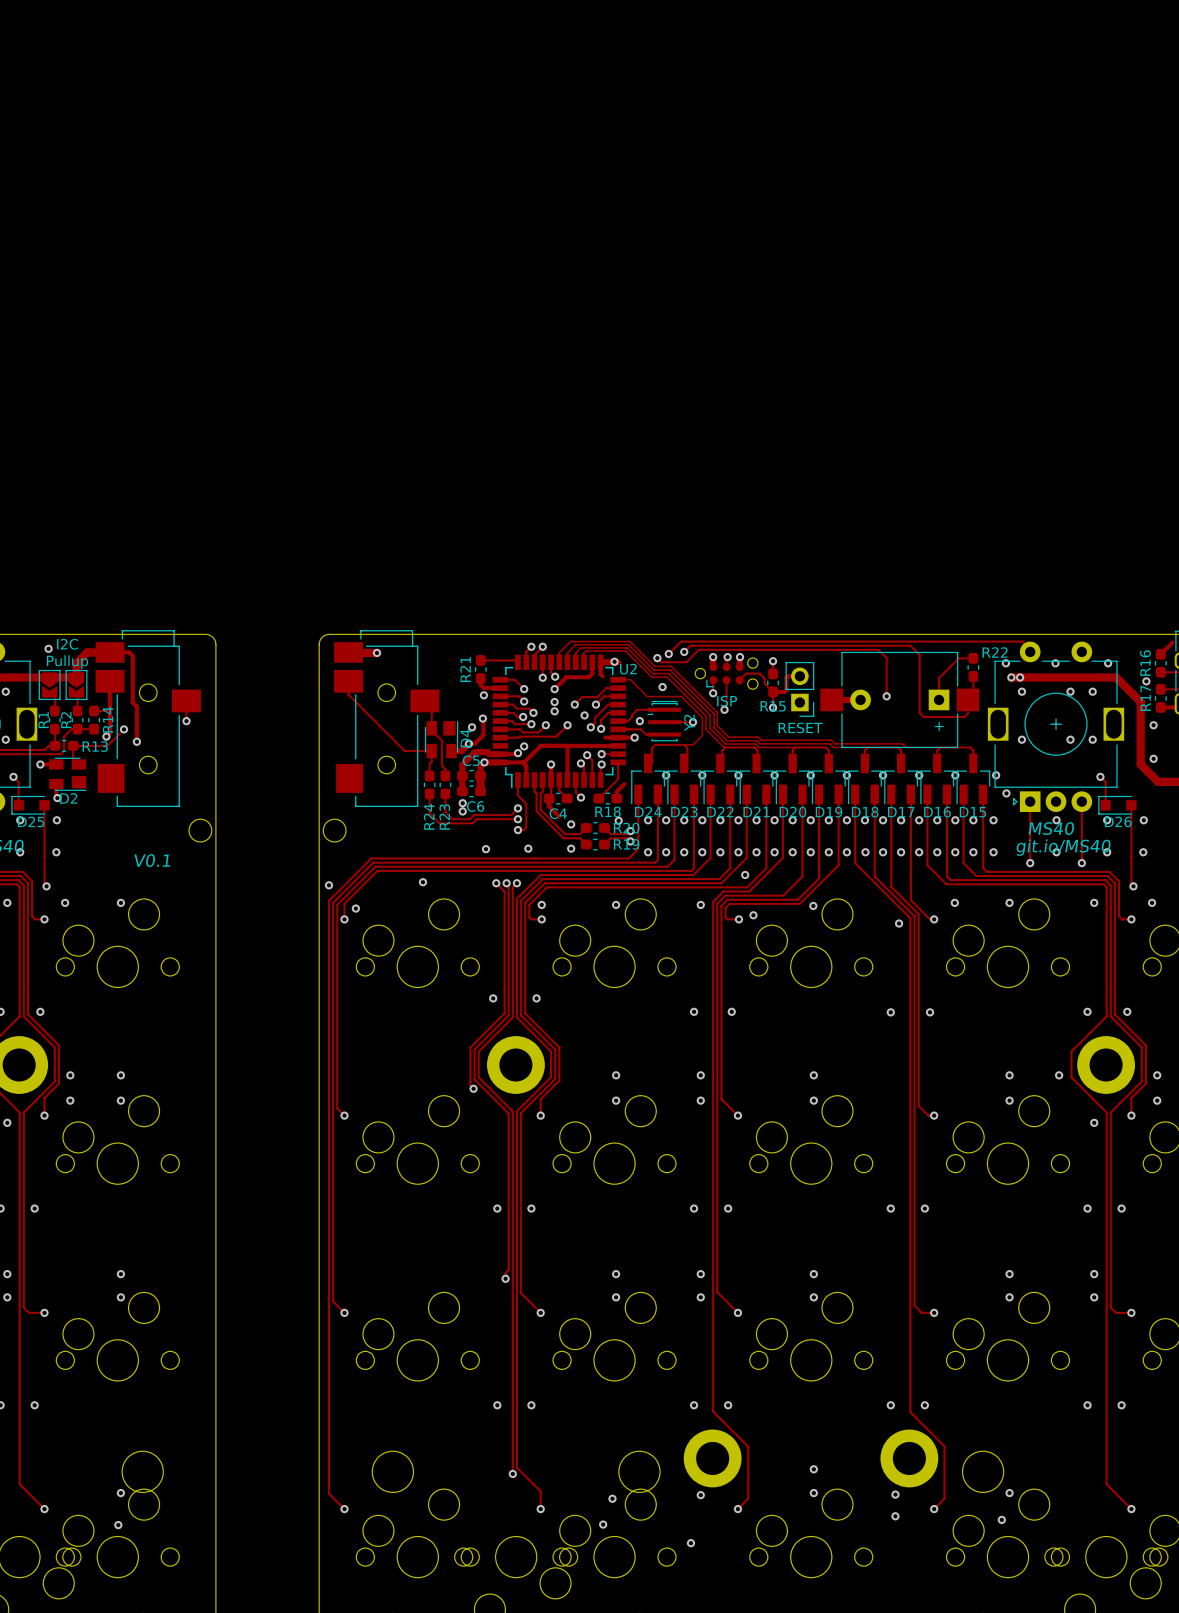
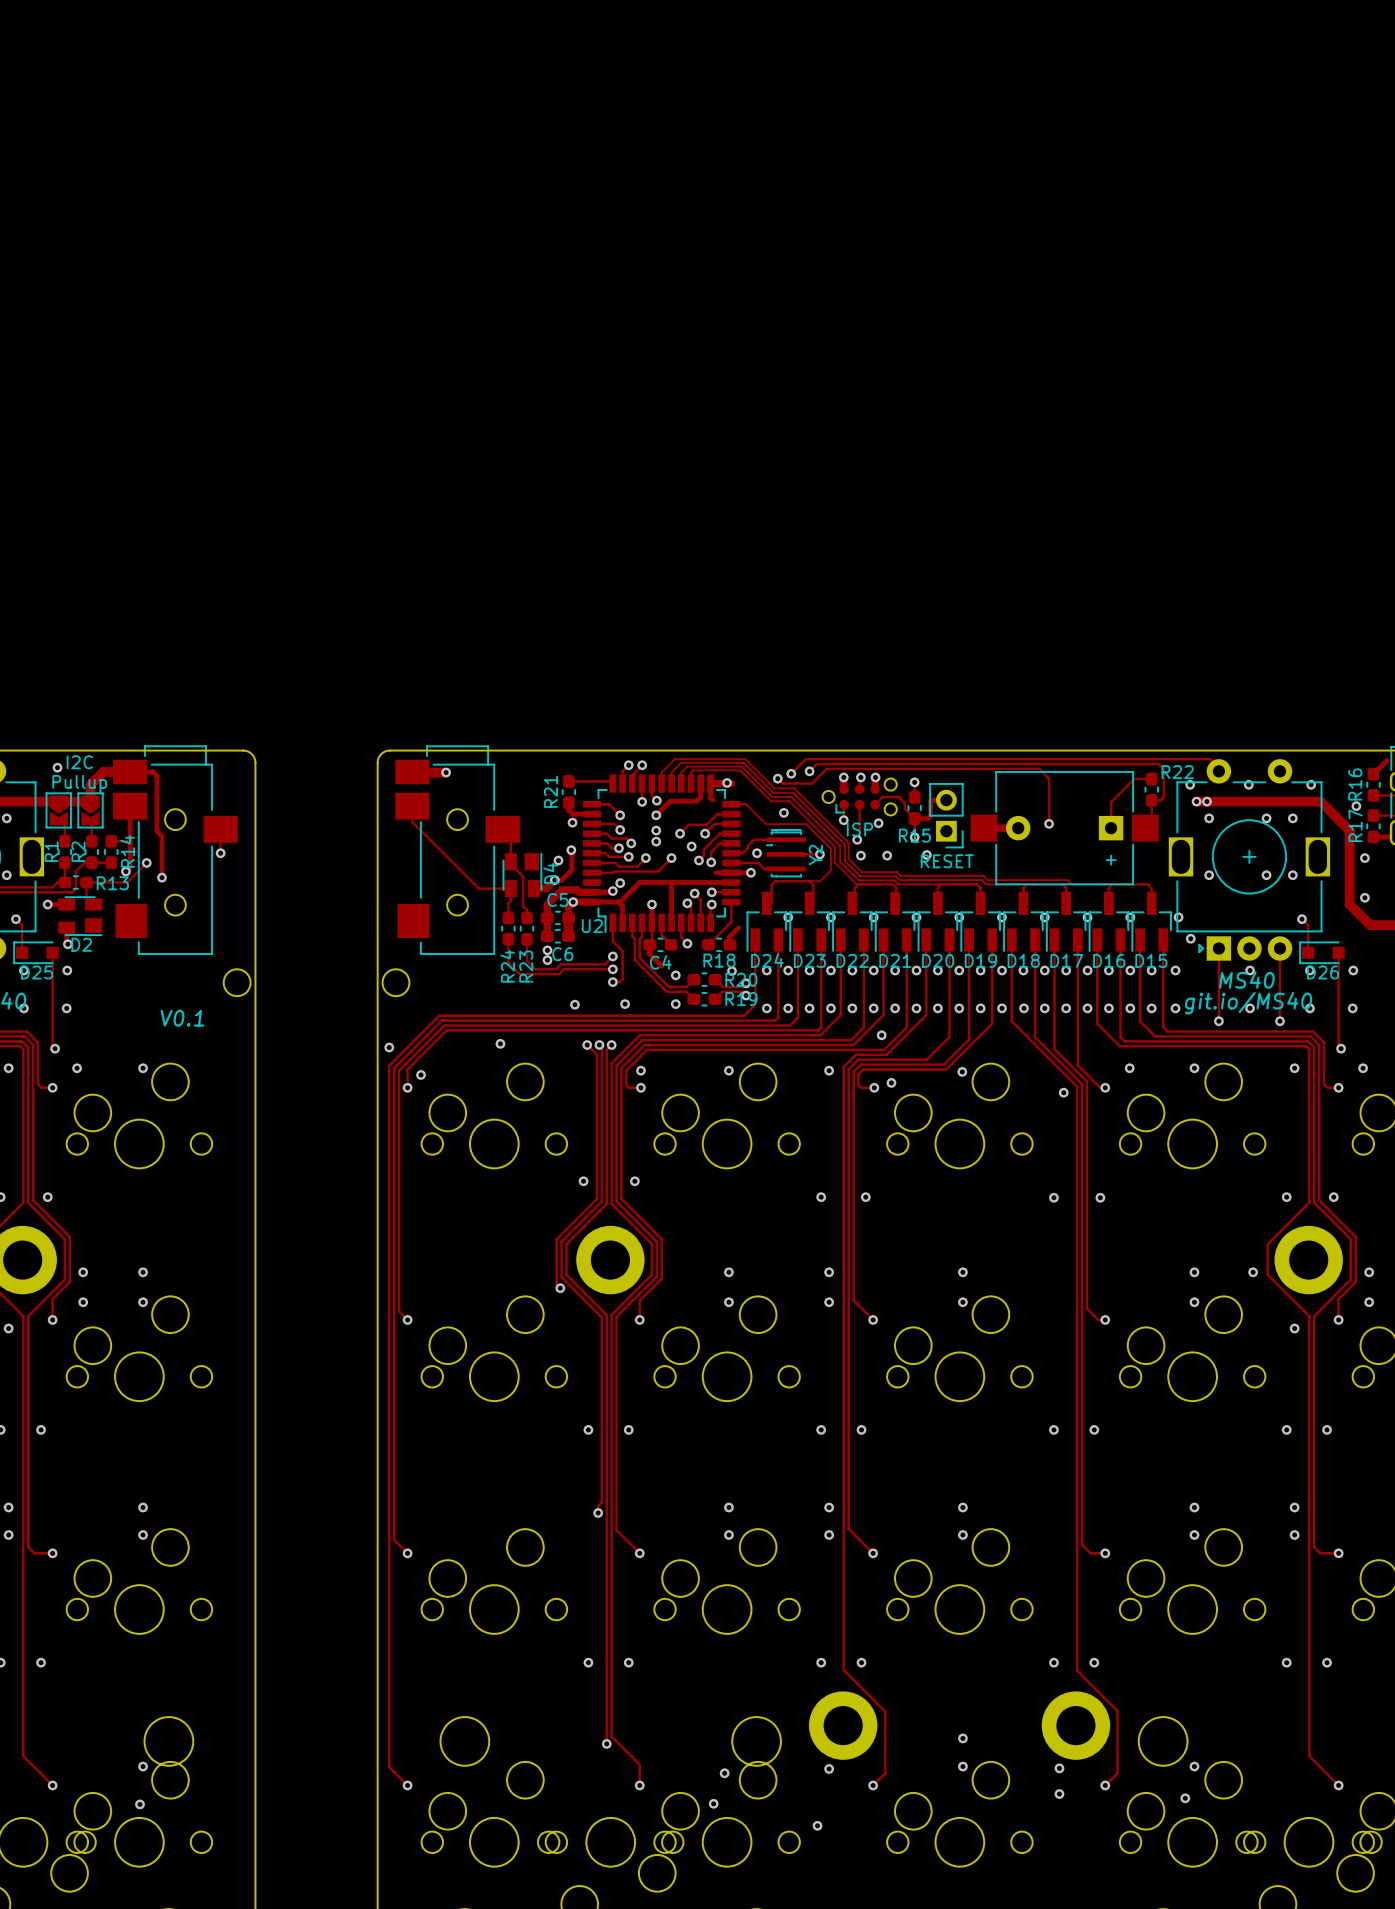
track: (910, 645) (919, 655) (919, 712) (923, 716) (964, 716) (967, 713) (967, 699) -> (1077, 764) (1158, 764) (1163, 769) (1163, 796) (1160, 800) (1151, 800)
U2 name position: U2 (628, 669) -> U2 (592, 926)
via: none -> (878, 823)
via: none -> (926, 855)
via: none -> (860, 855)
via: none -> (887, 855)

